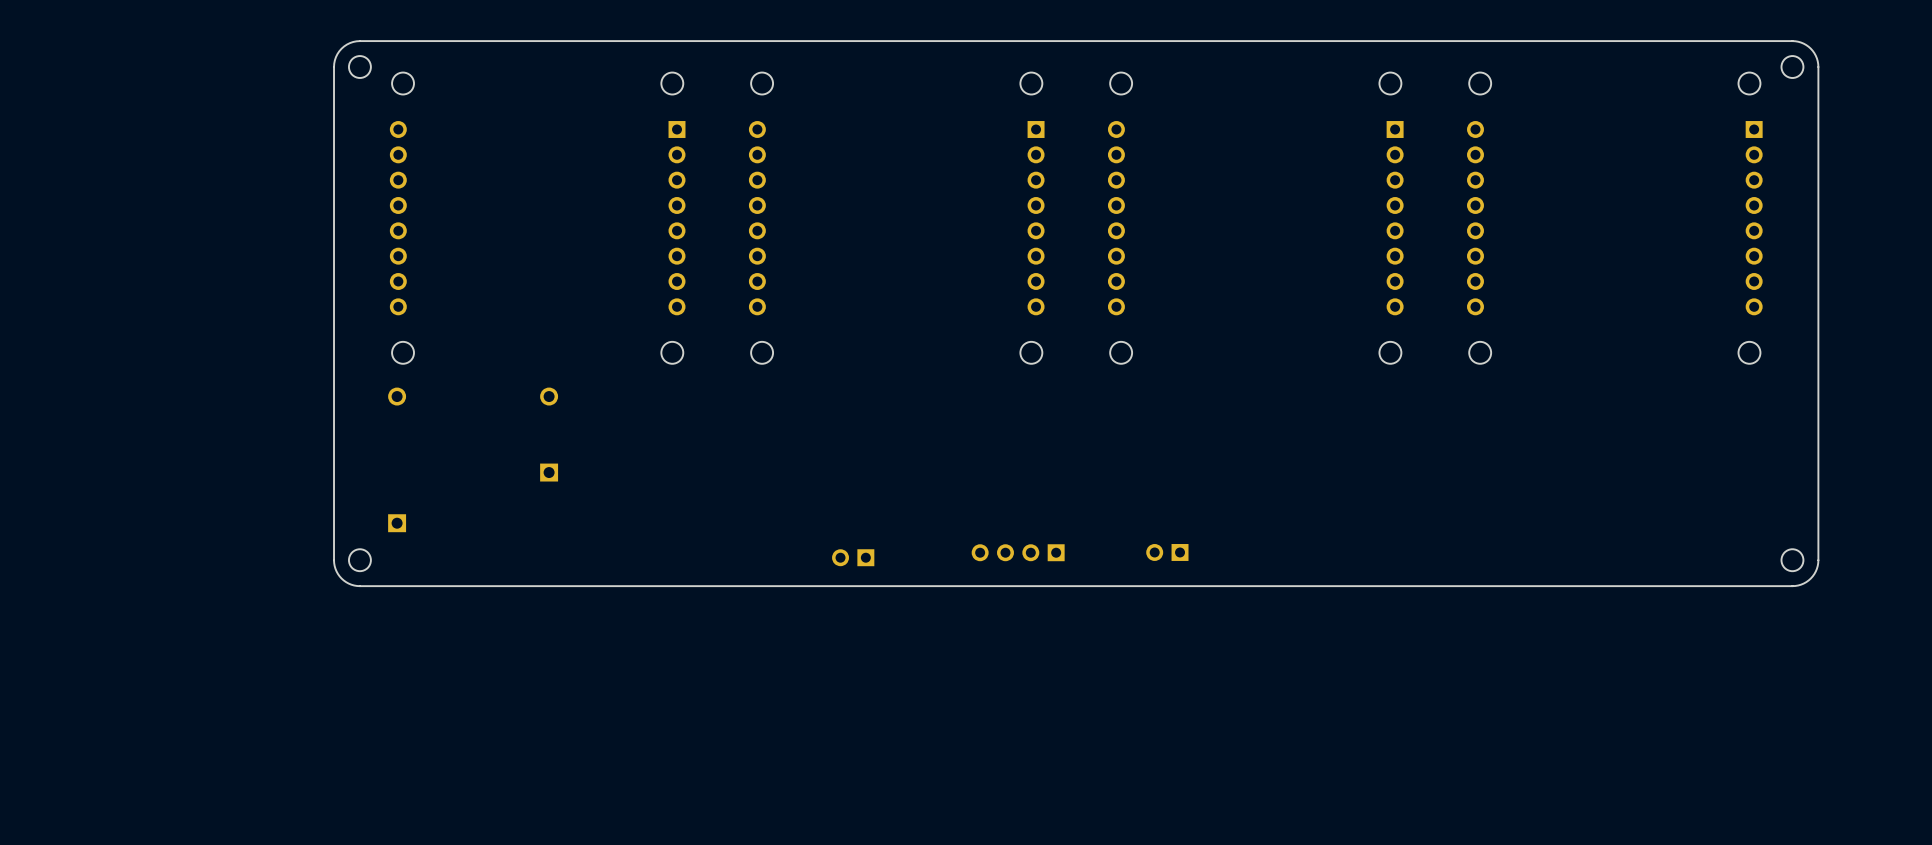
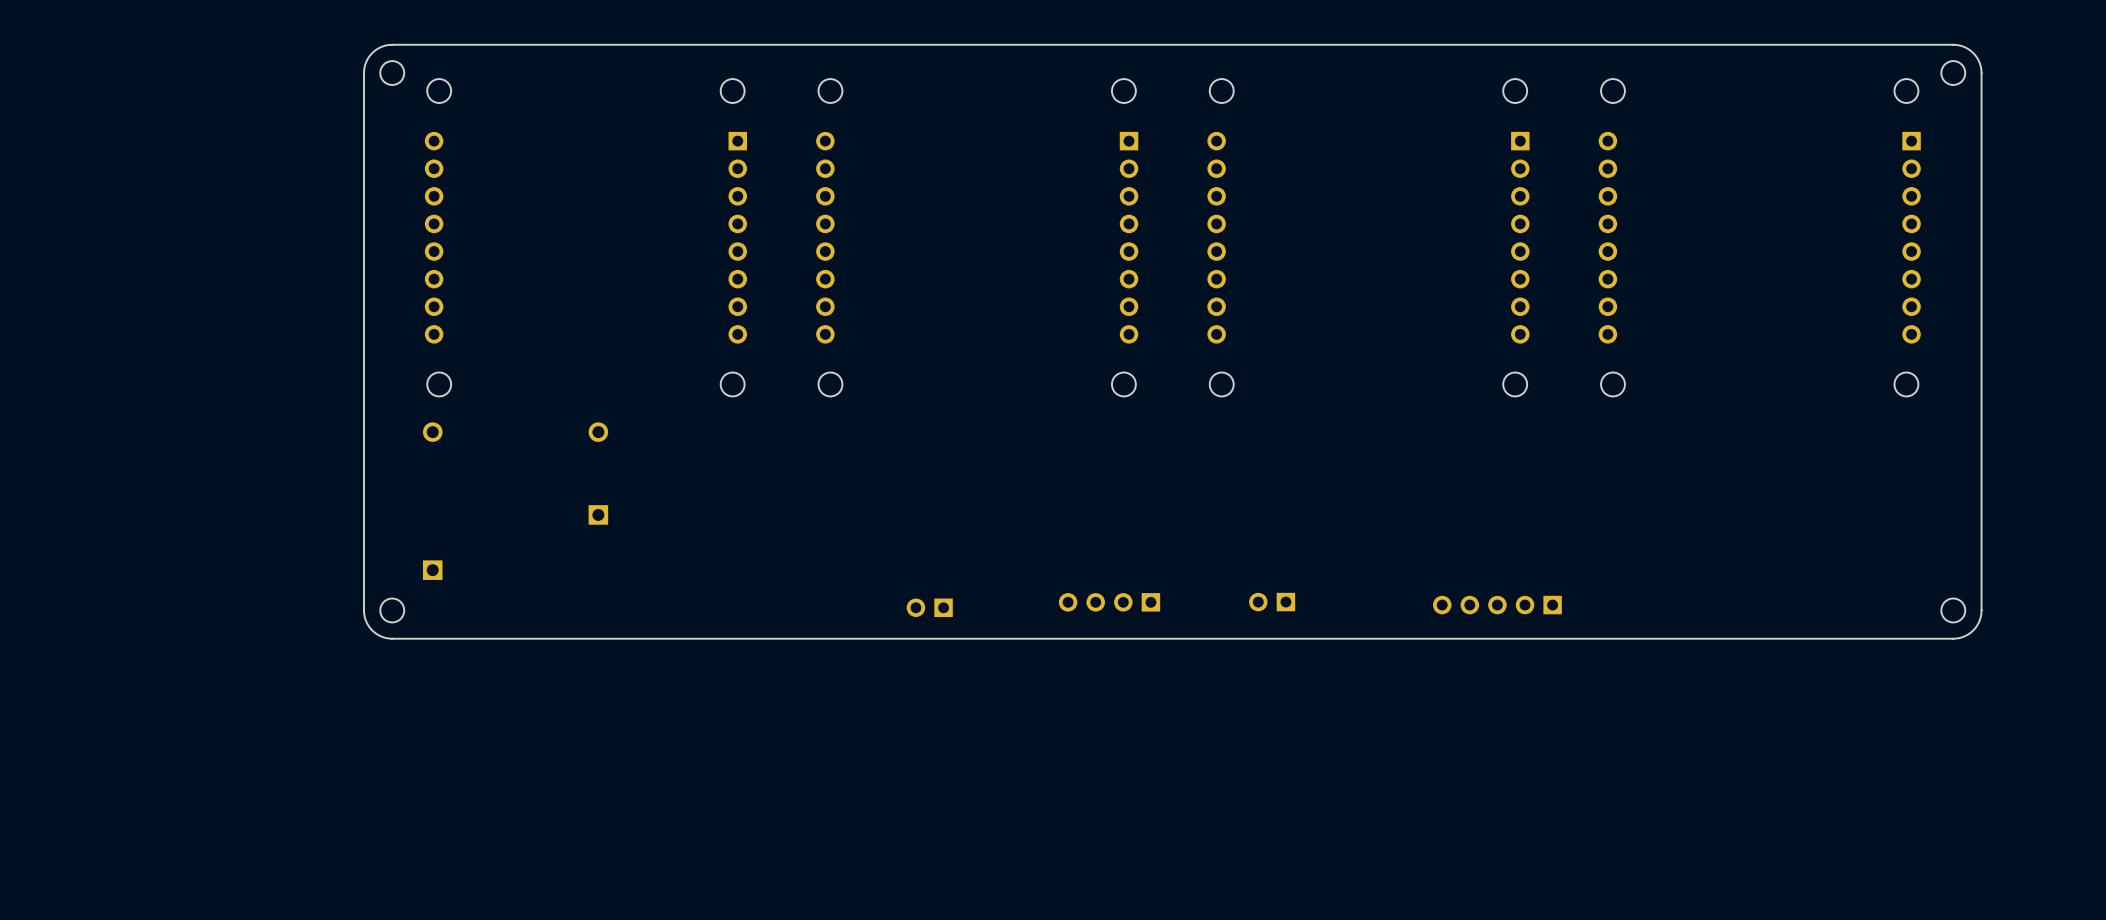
part: none -> (1497, 605)

